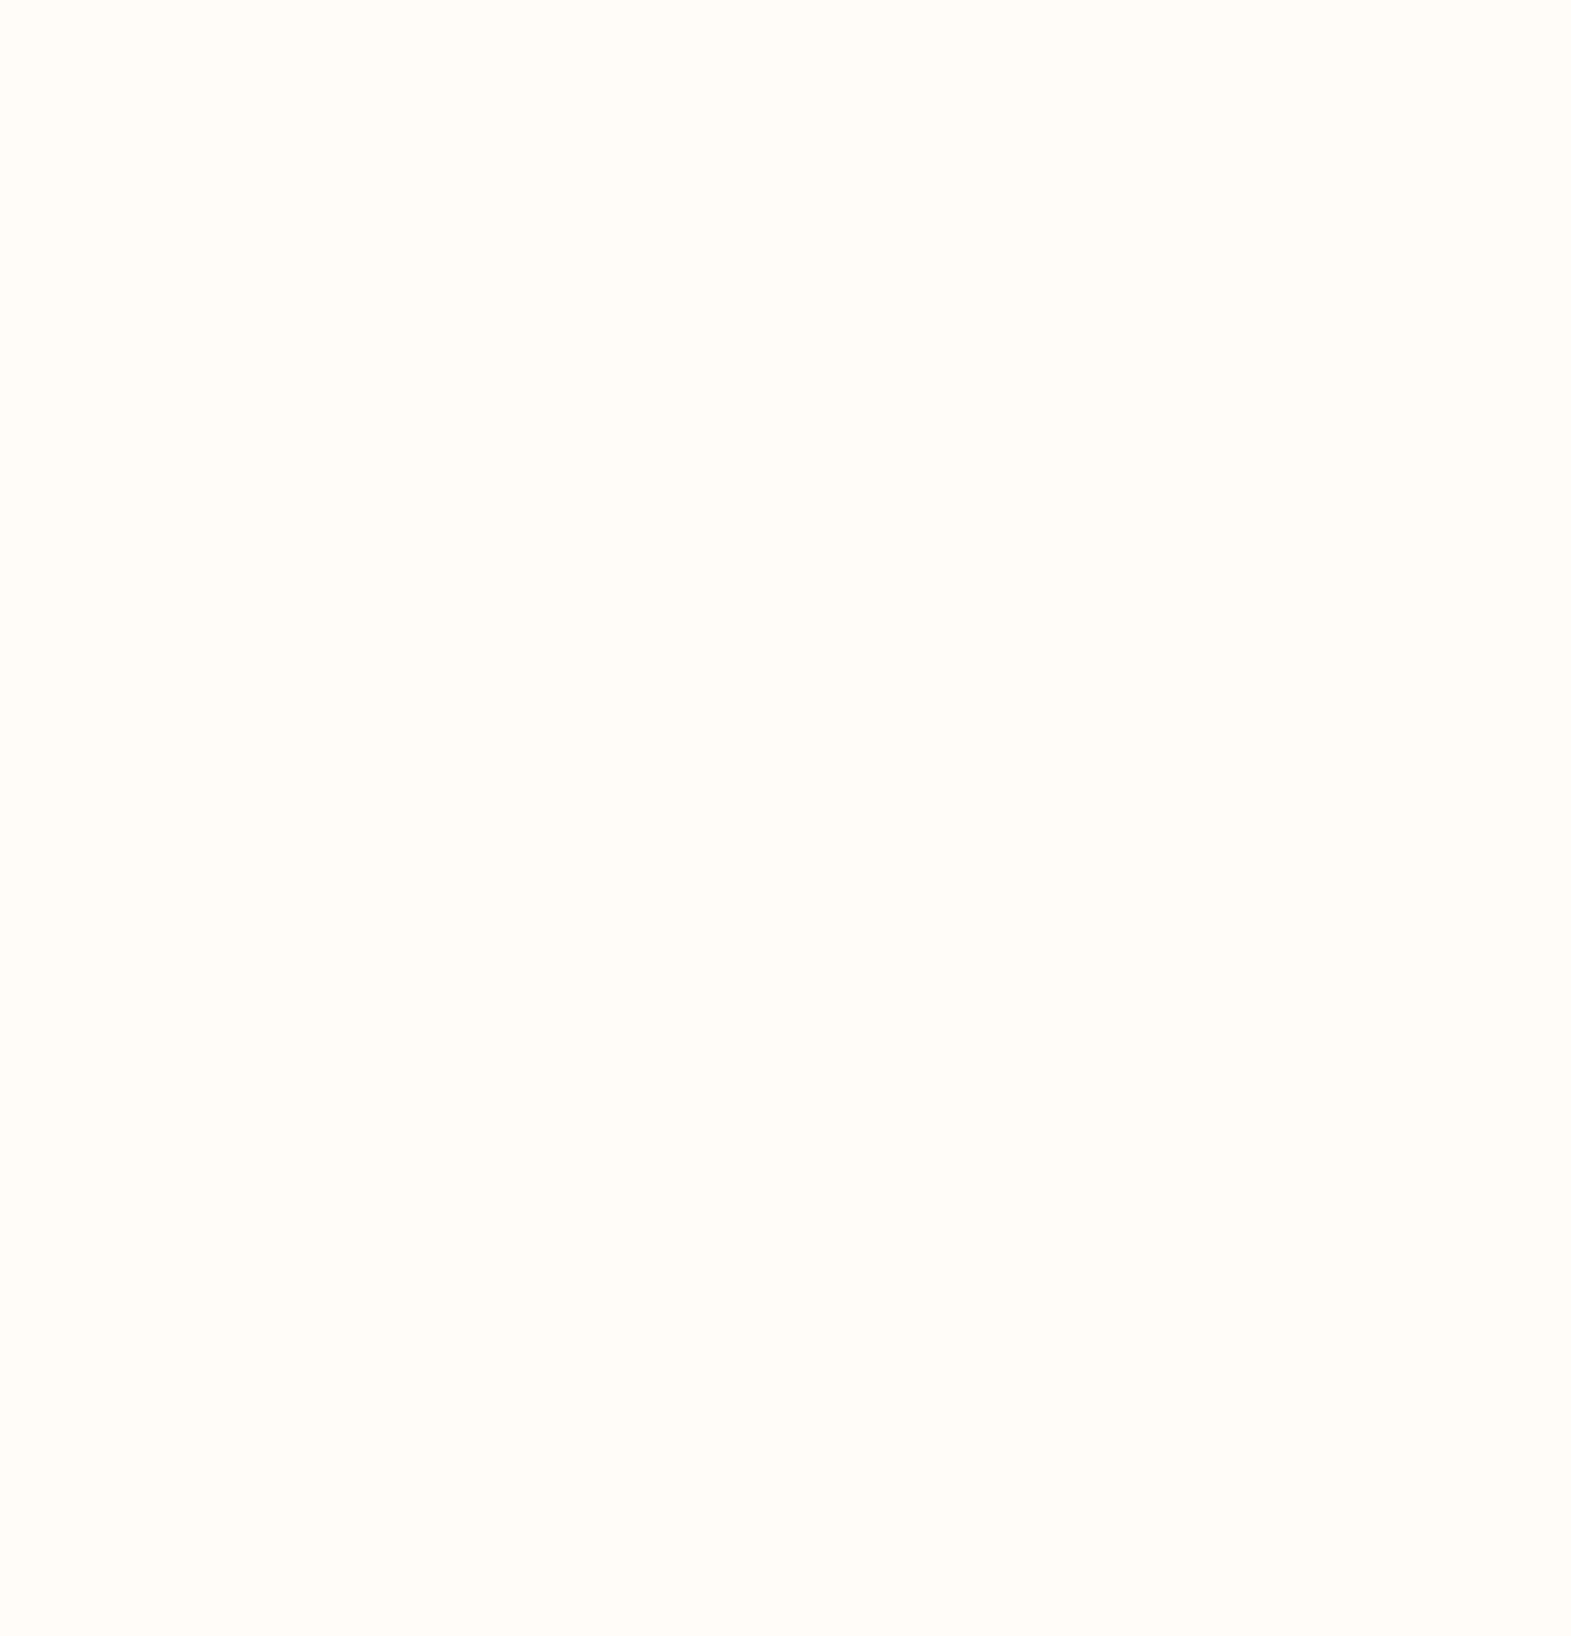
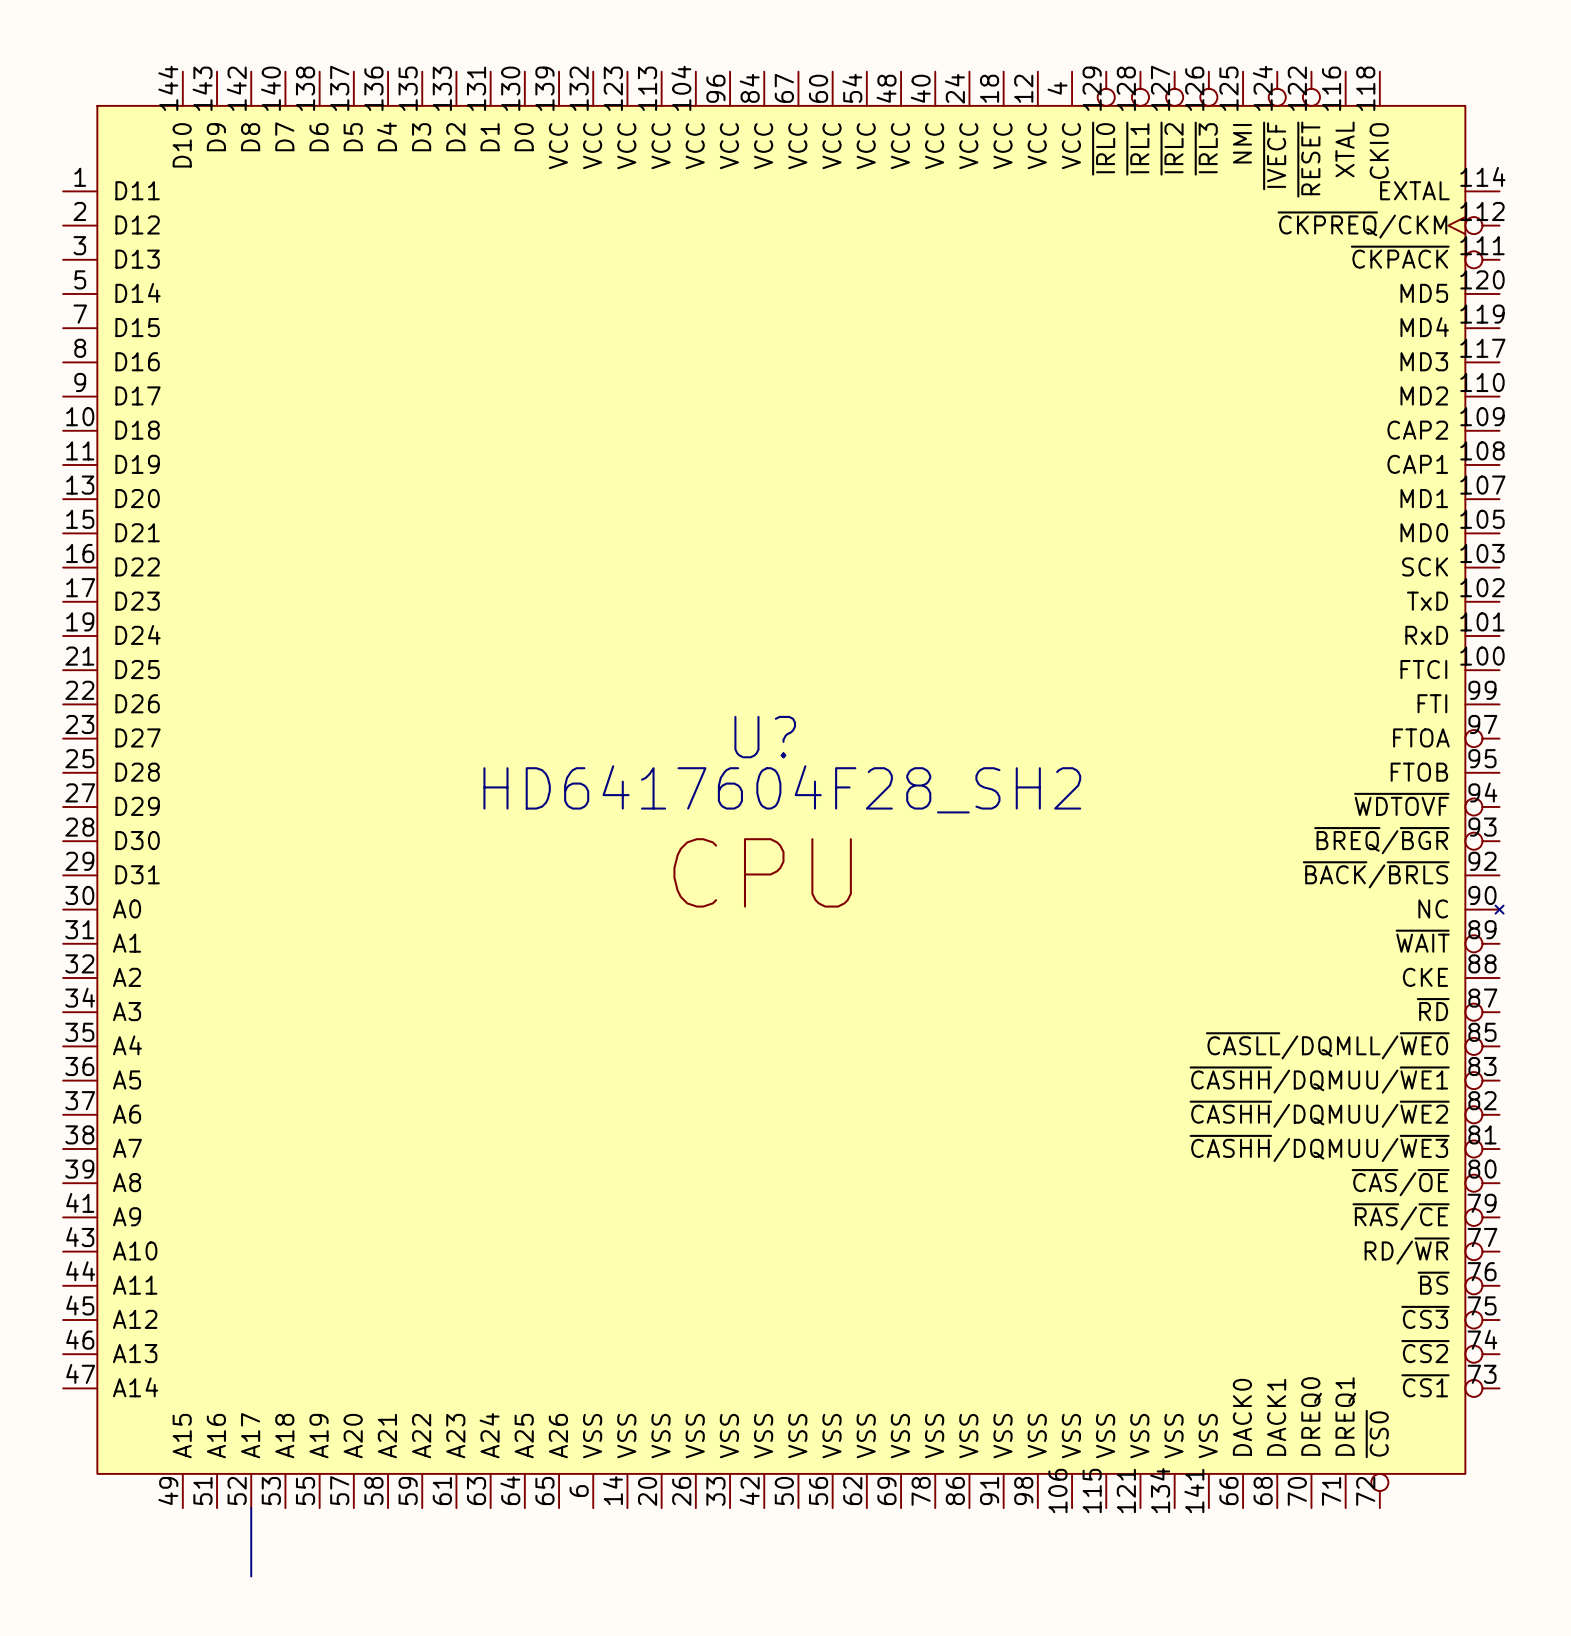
U?: none -> HD6417604F28_SH2 (783, 789)
wire: none -> (251, 1508) (251, 1576)

